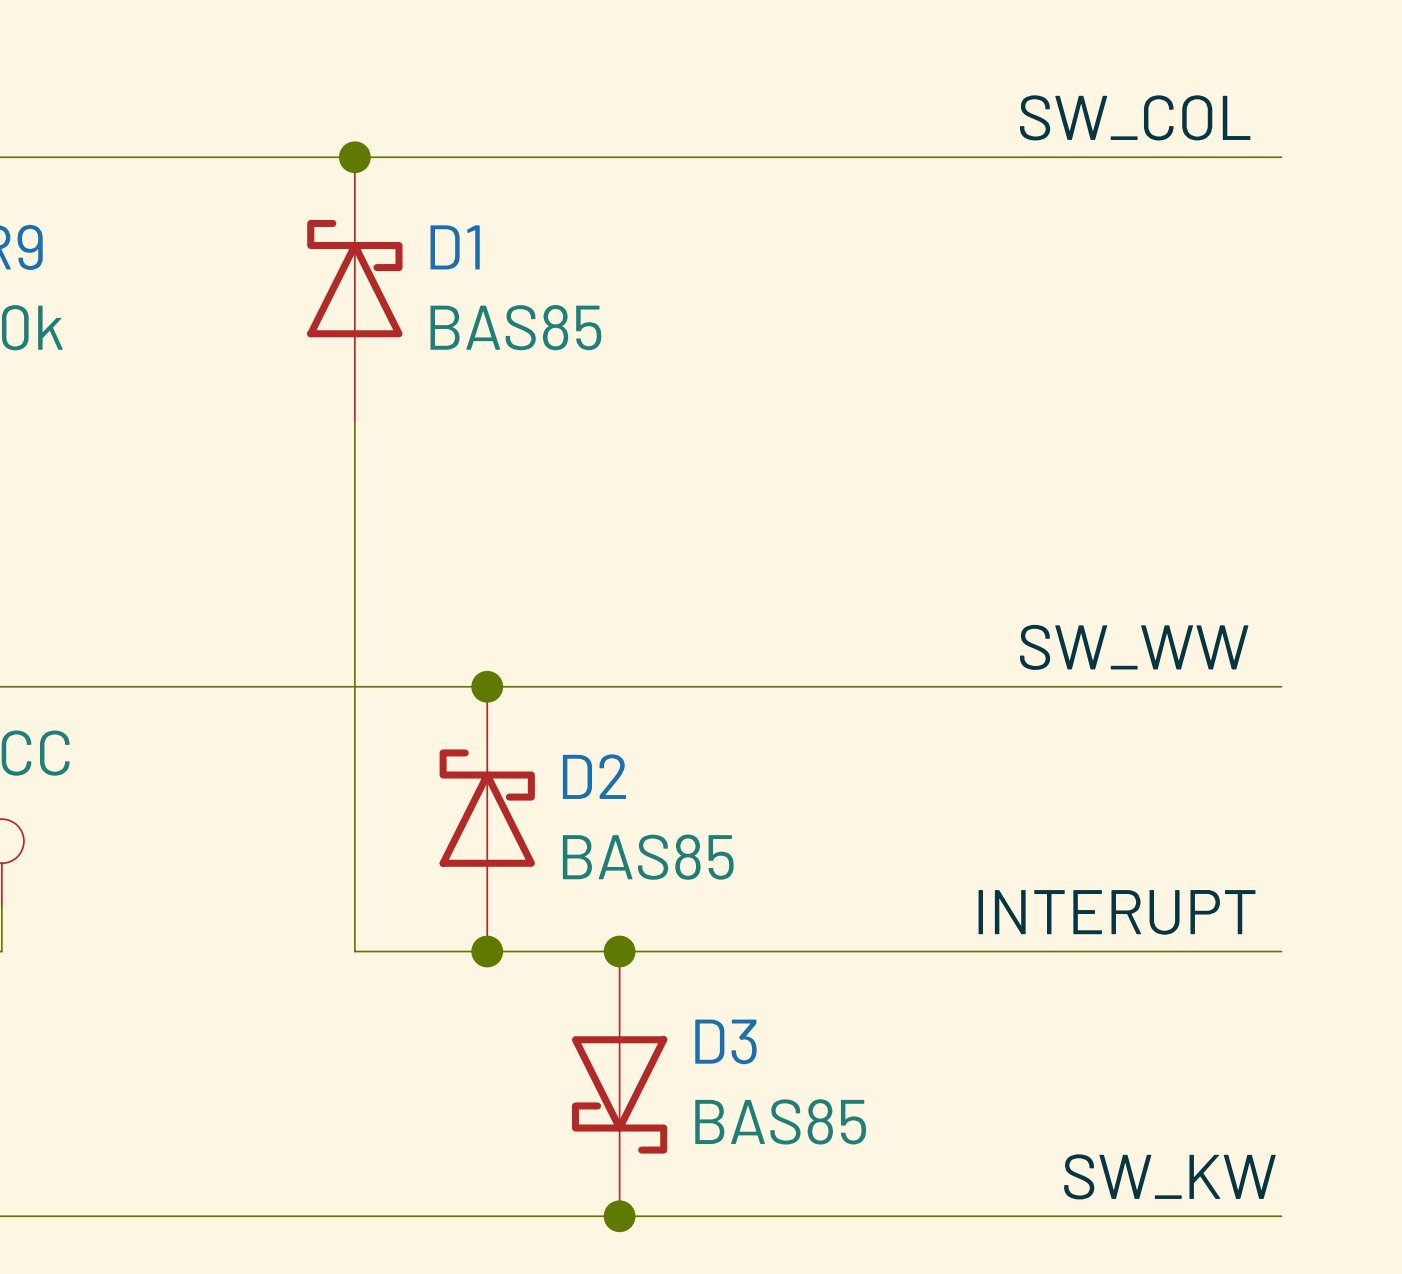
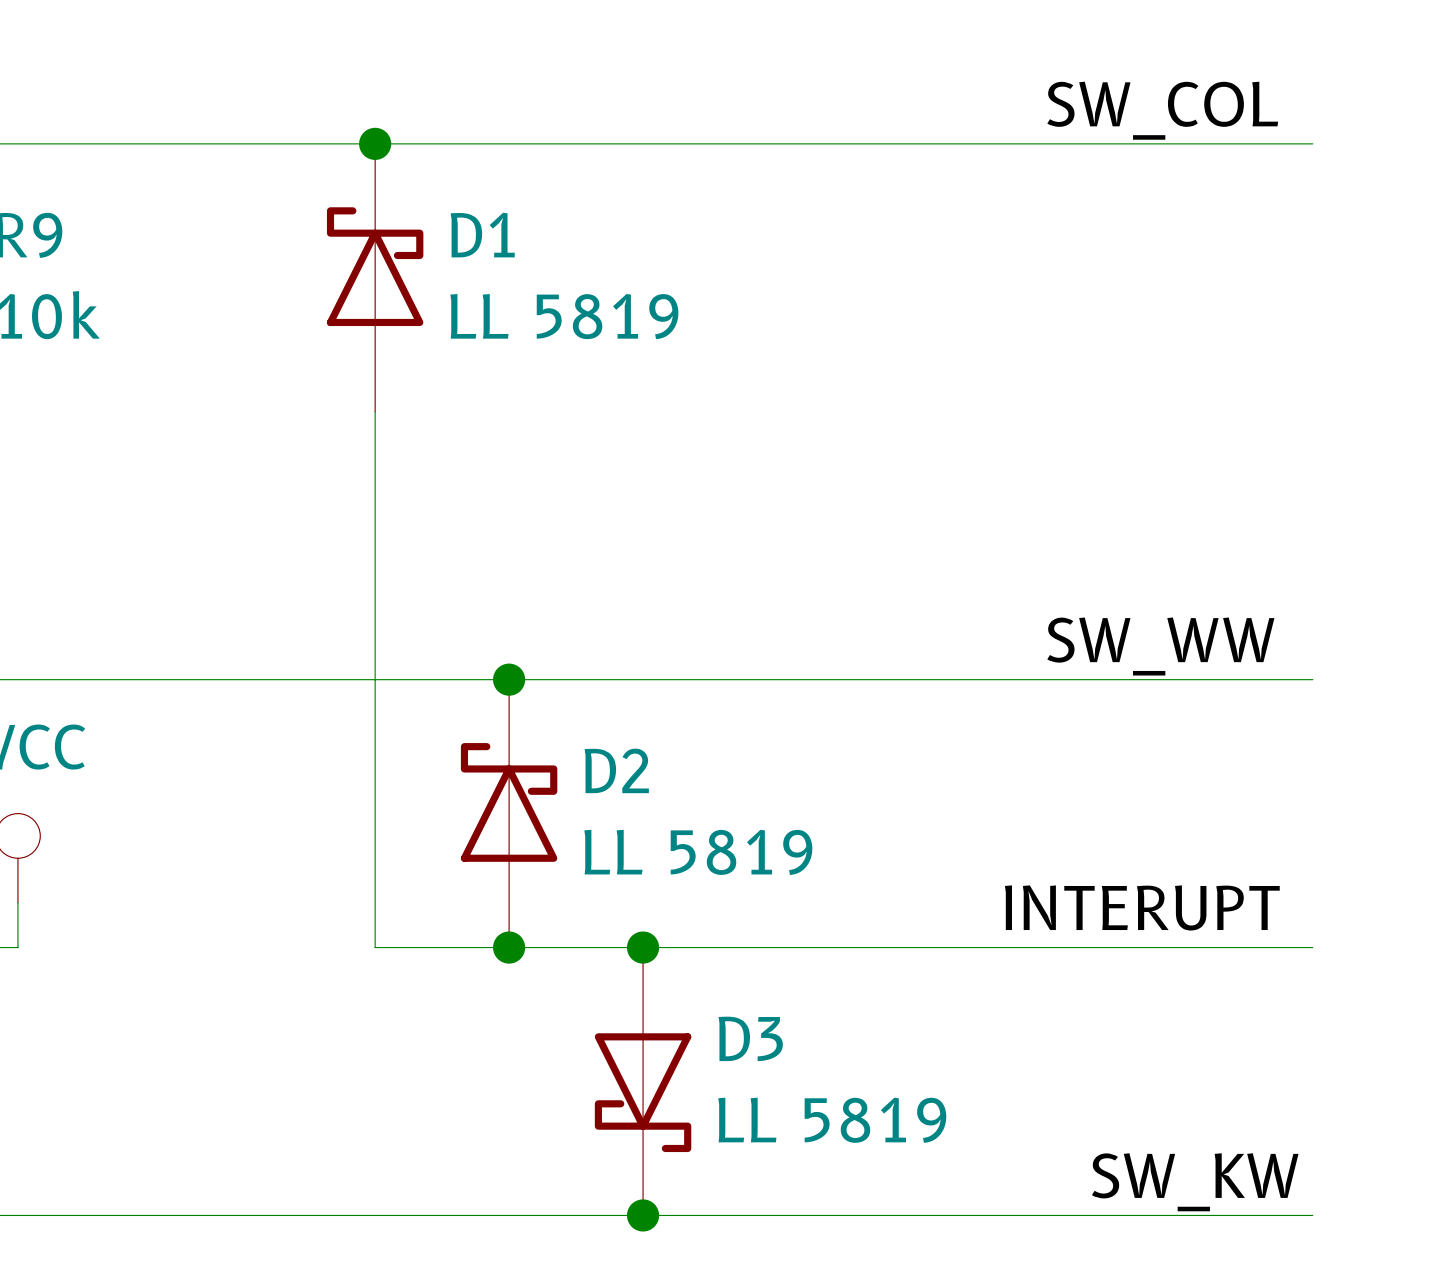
D1 value: BAS85 (515, 327) -> LL 5819 (564, 316)
D2 value: BAS85 (648, 857) -> LL 5819 (698, 852)
D3 value: BAS85 (780, 1121) -> LL 5819 (832, 1120)

